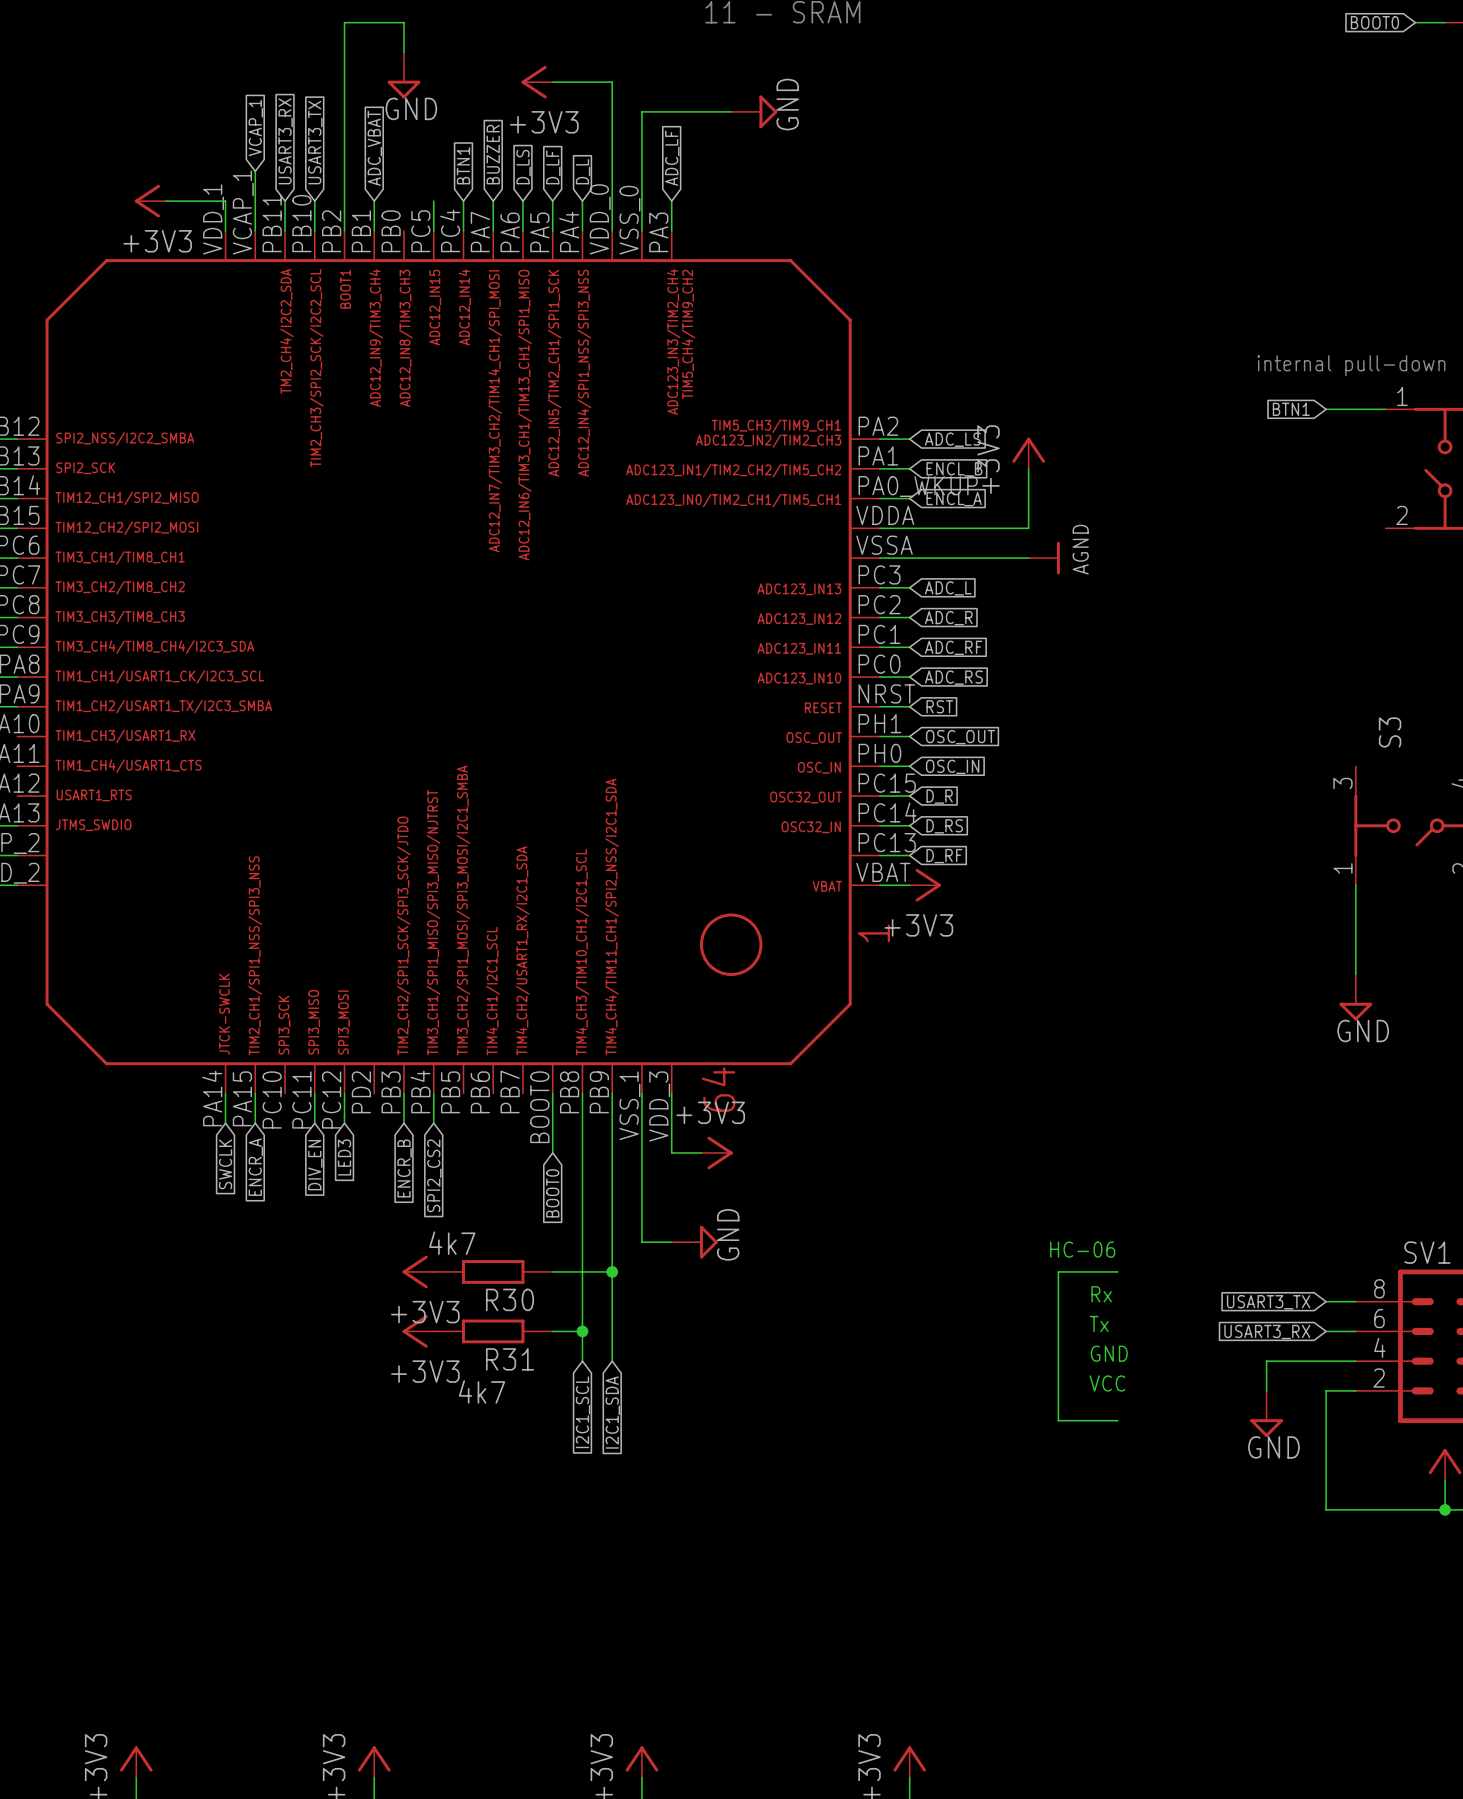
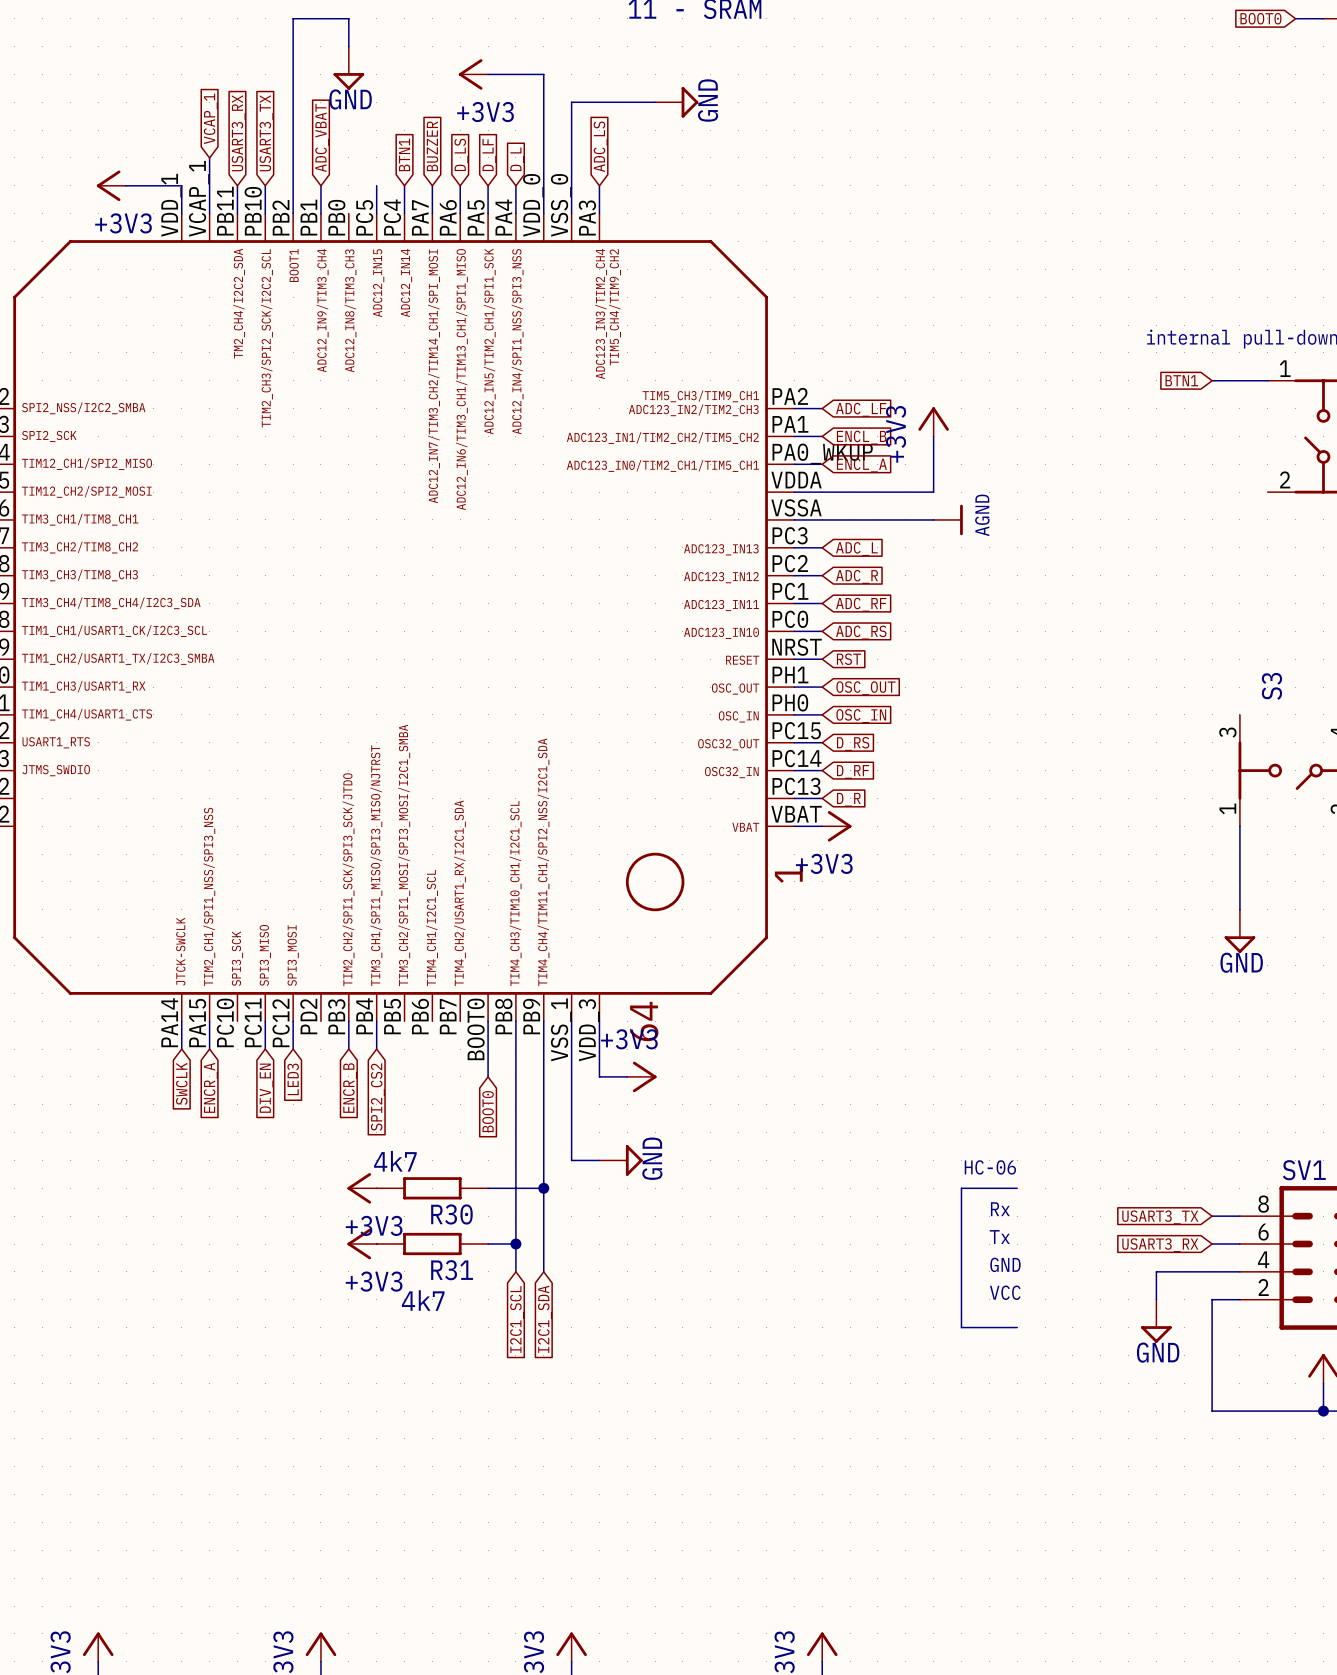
global label: ADC_LF (672, 158) -> ADC_LS (600, 146)
global label: ADC_LS (952, 439) -> ADC_LF (861, 409)
global label: D_R (939, 796) -> D_RS (853, 744)
global label: D_RS (944, 826) -> D_RF (853, 771)
global label: D_RF (944, 856) -> D_R (848, 799)

